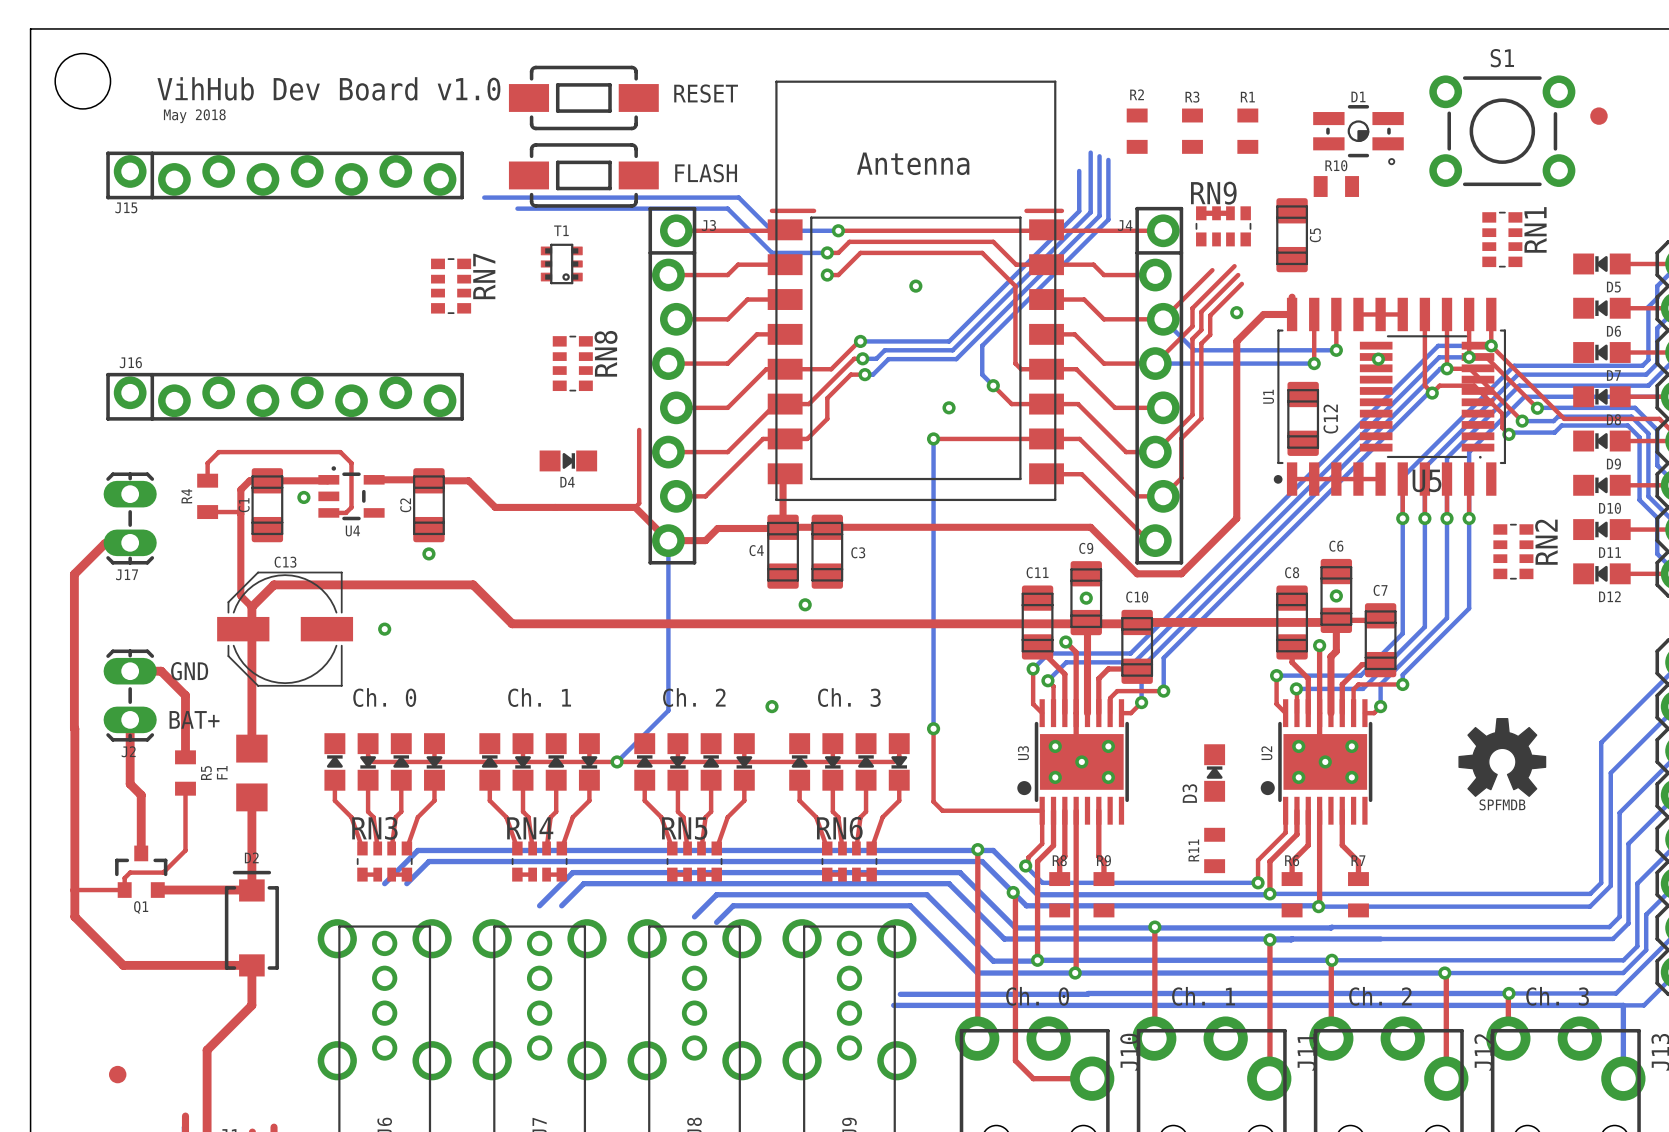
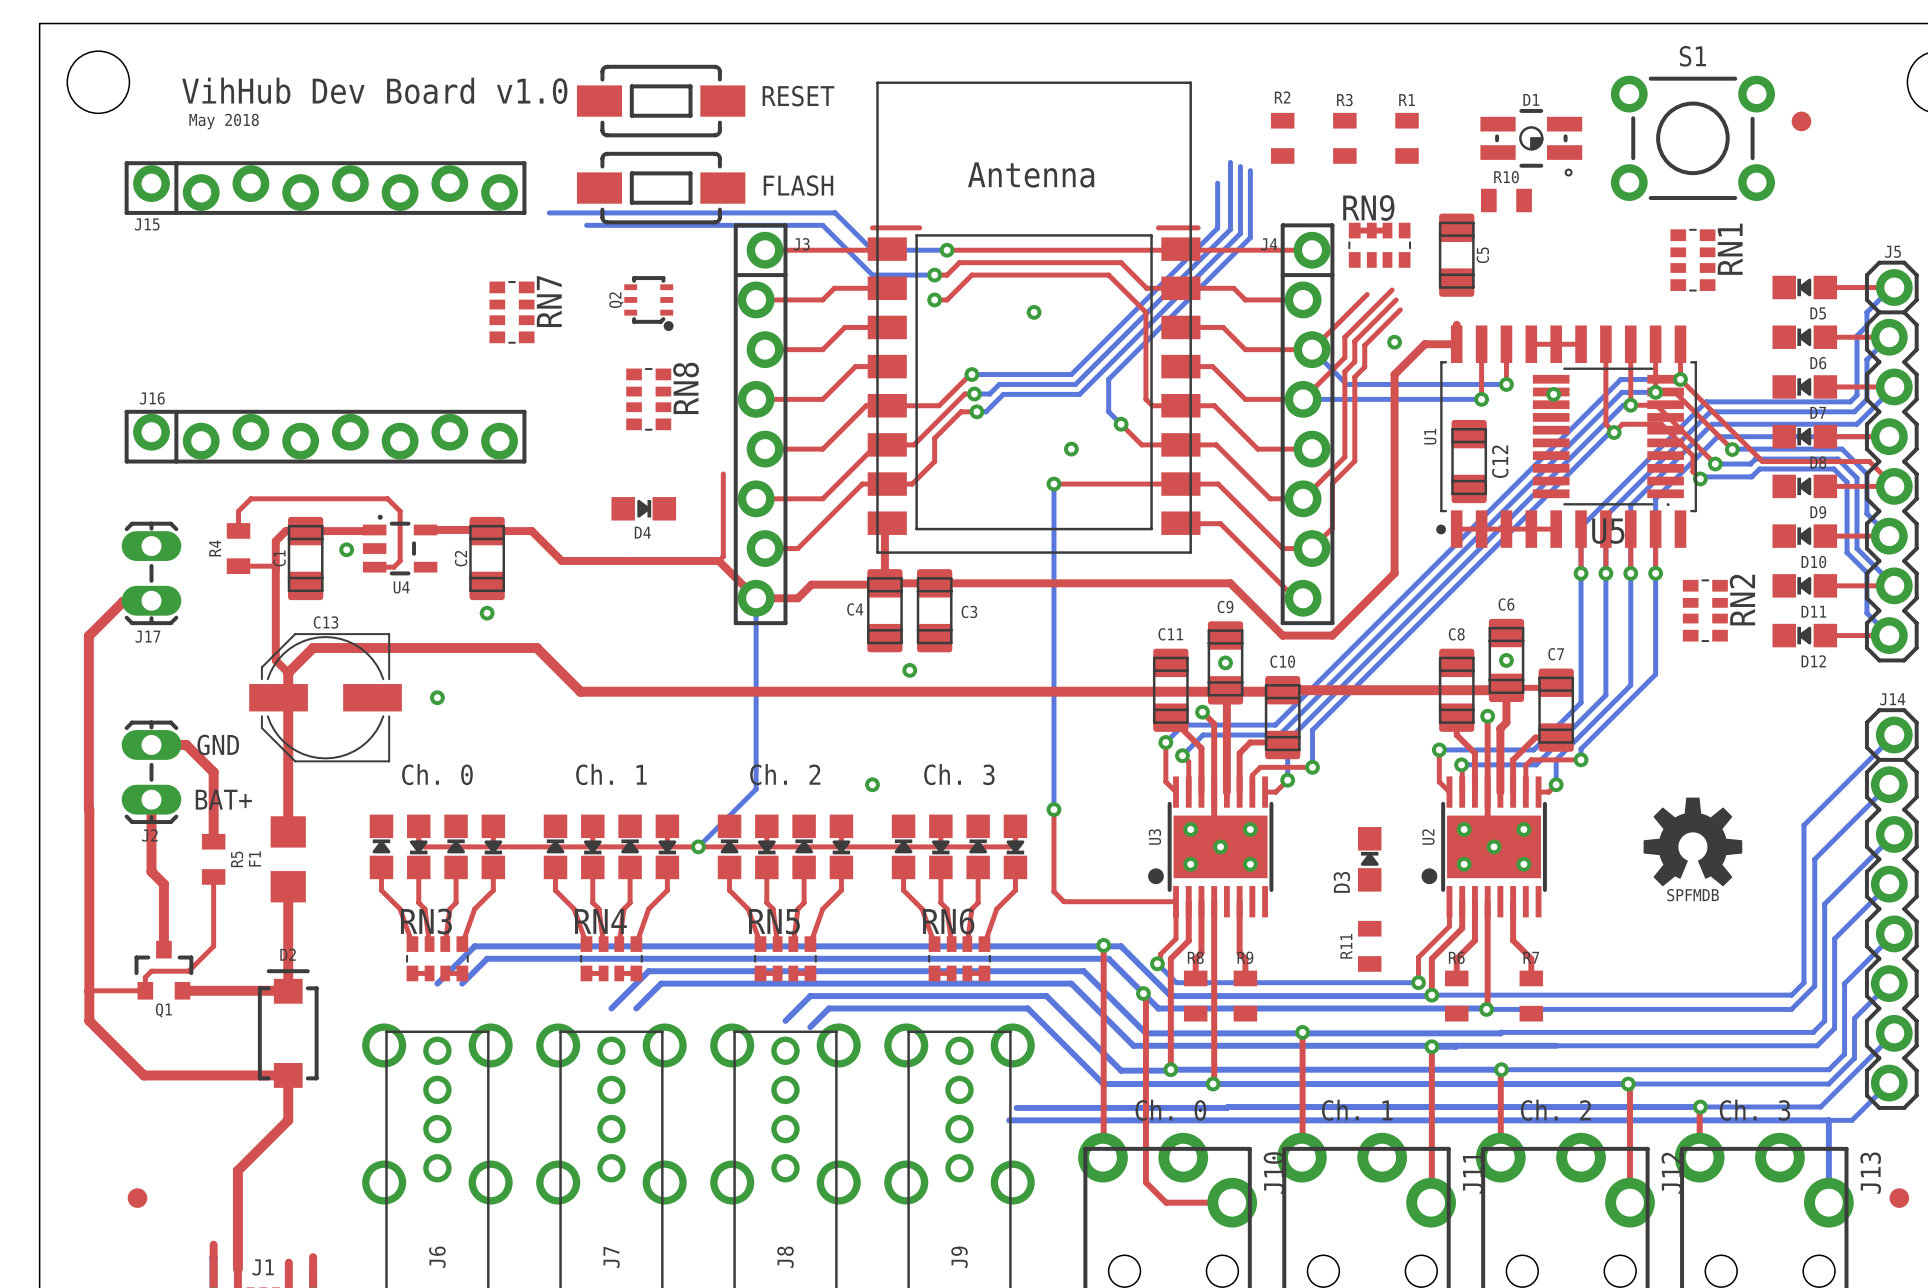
T1: (561, 263) -> none
Q2: none -> (648, 303)

